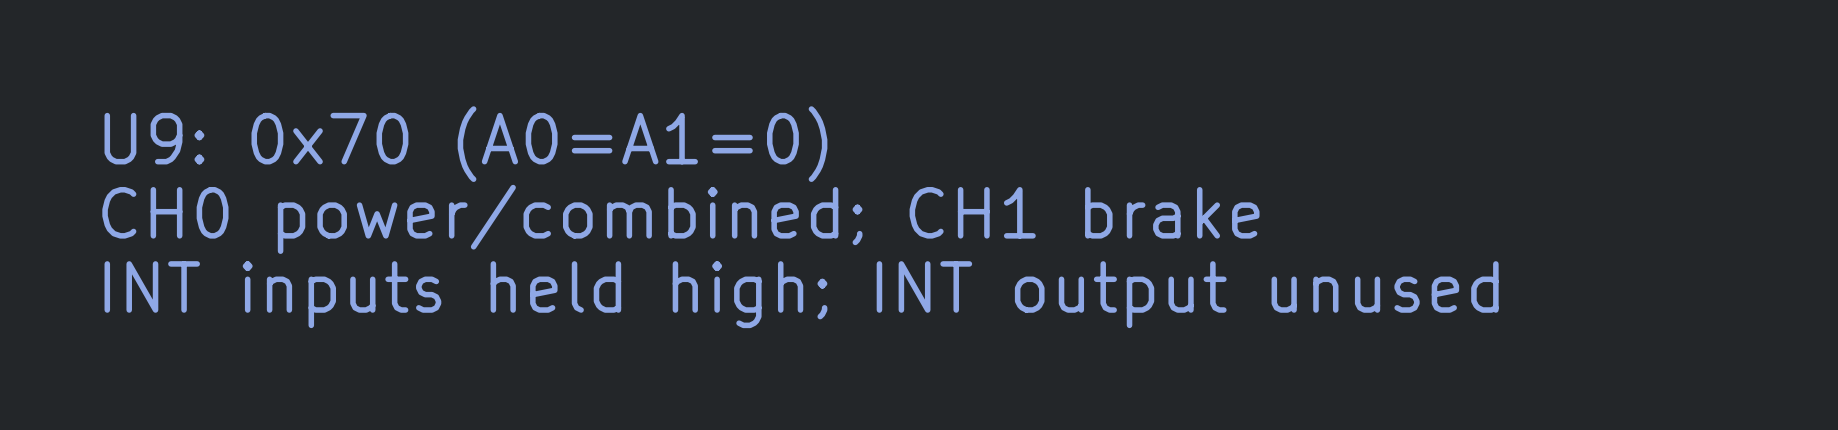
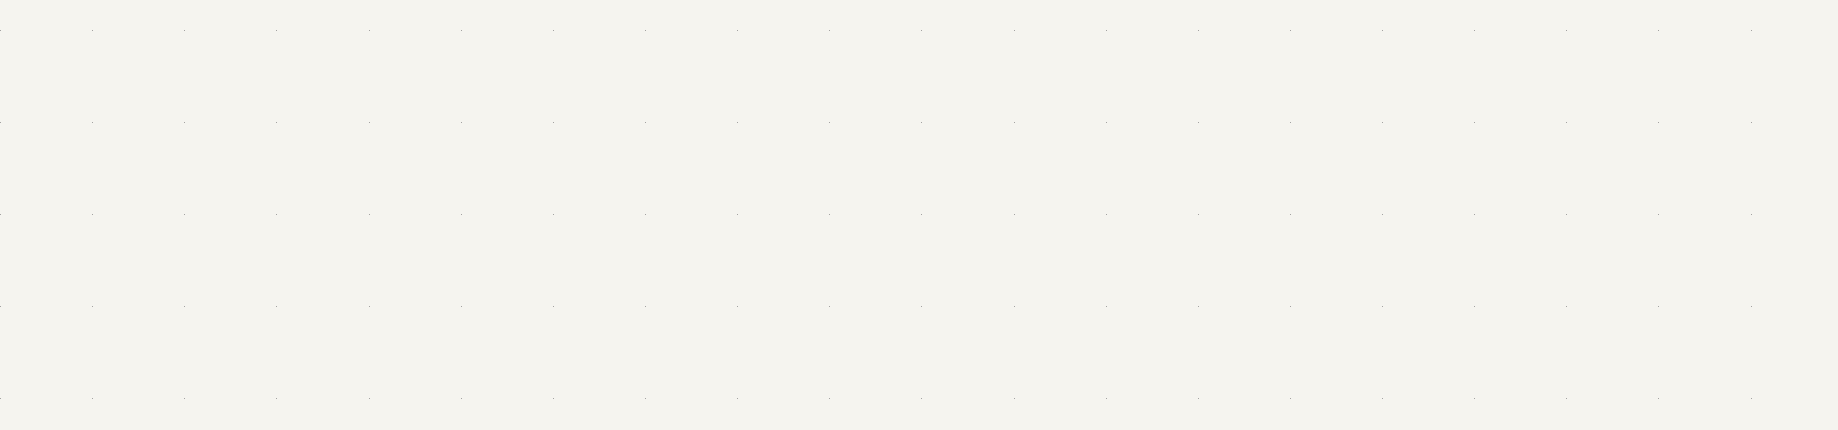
text: U9: 0x70 (A0=A1=0) (465, 144) -> none
text: CH0 power/combined; CH1 brake (680, 219) -> none
text: INT inputs held high; INT output unused (801, 294) -> none

